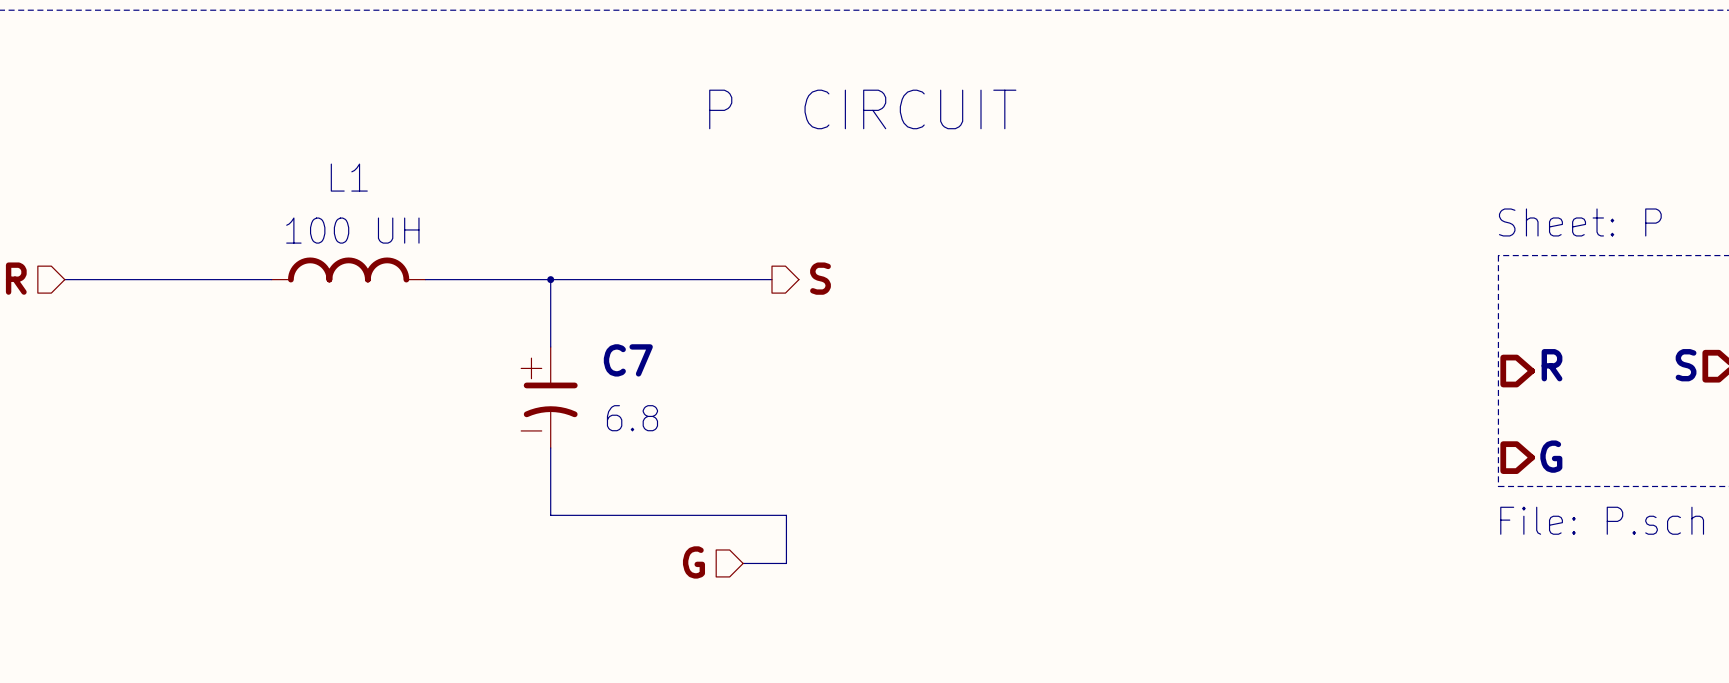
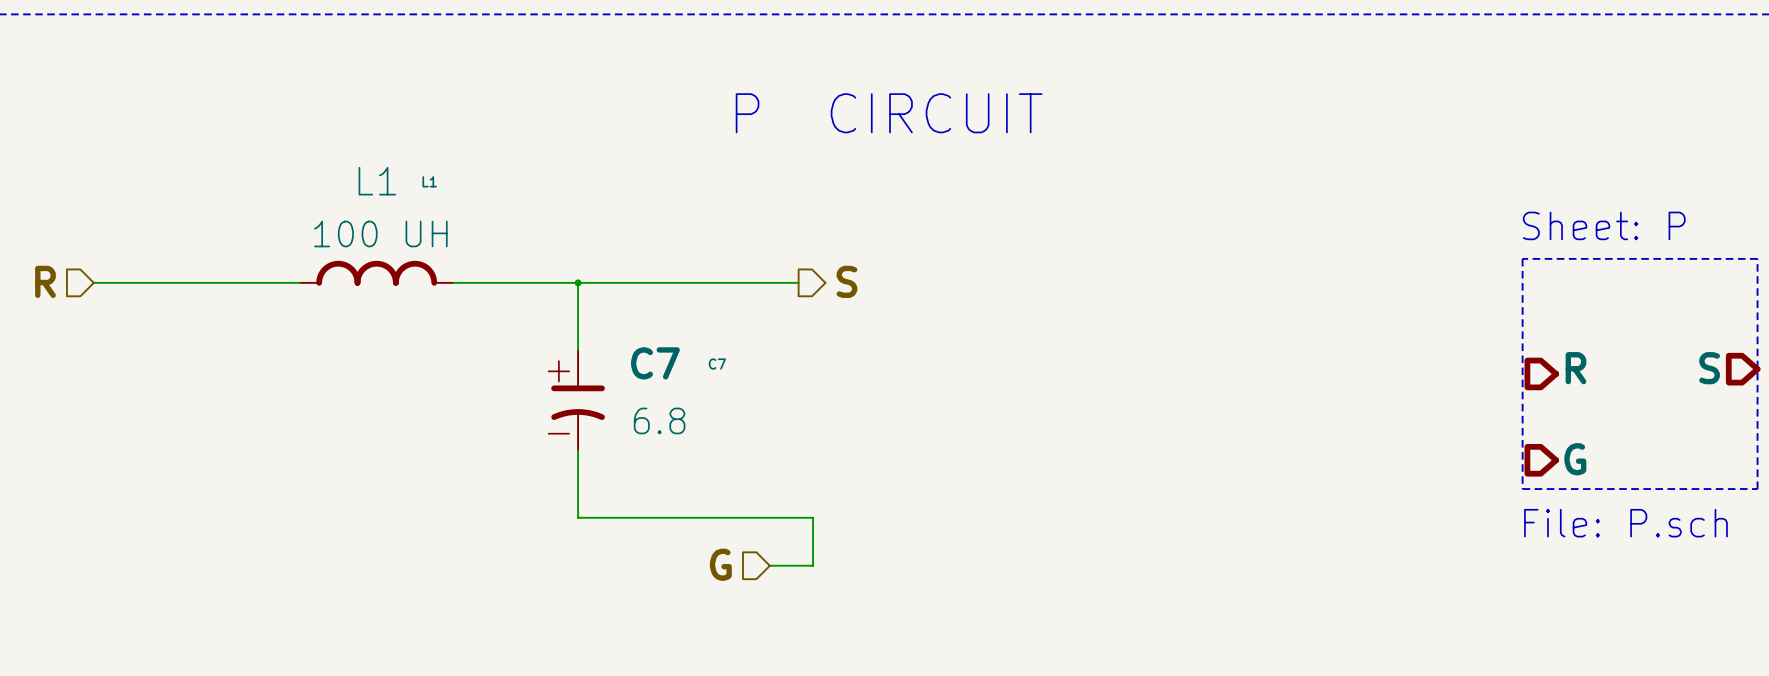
L1 name: none -> L1 (429, 181)
C7 name: none -> C7 (717, 364)

